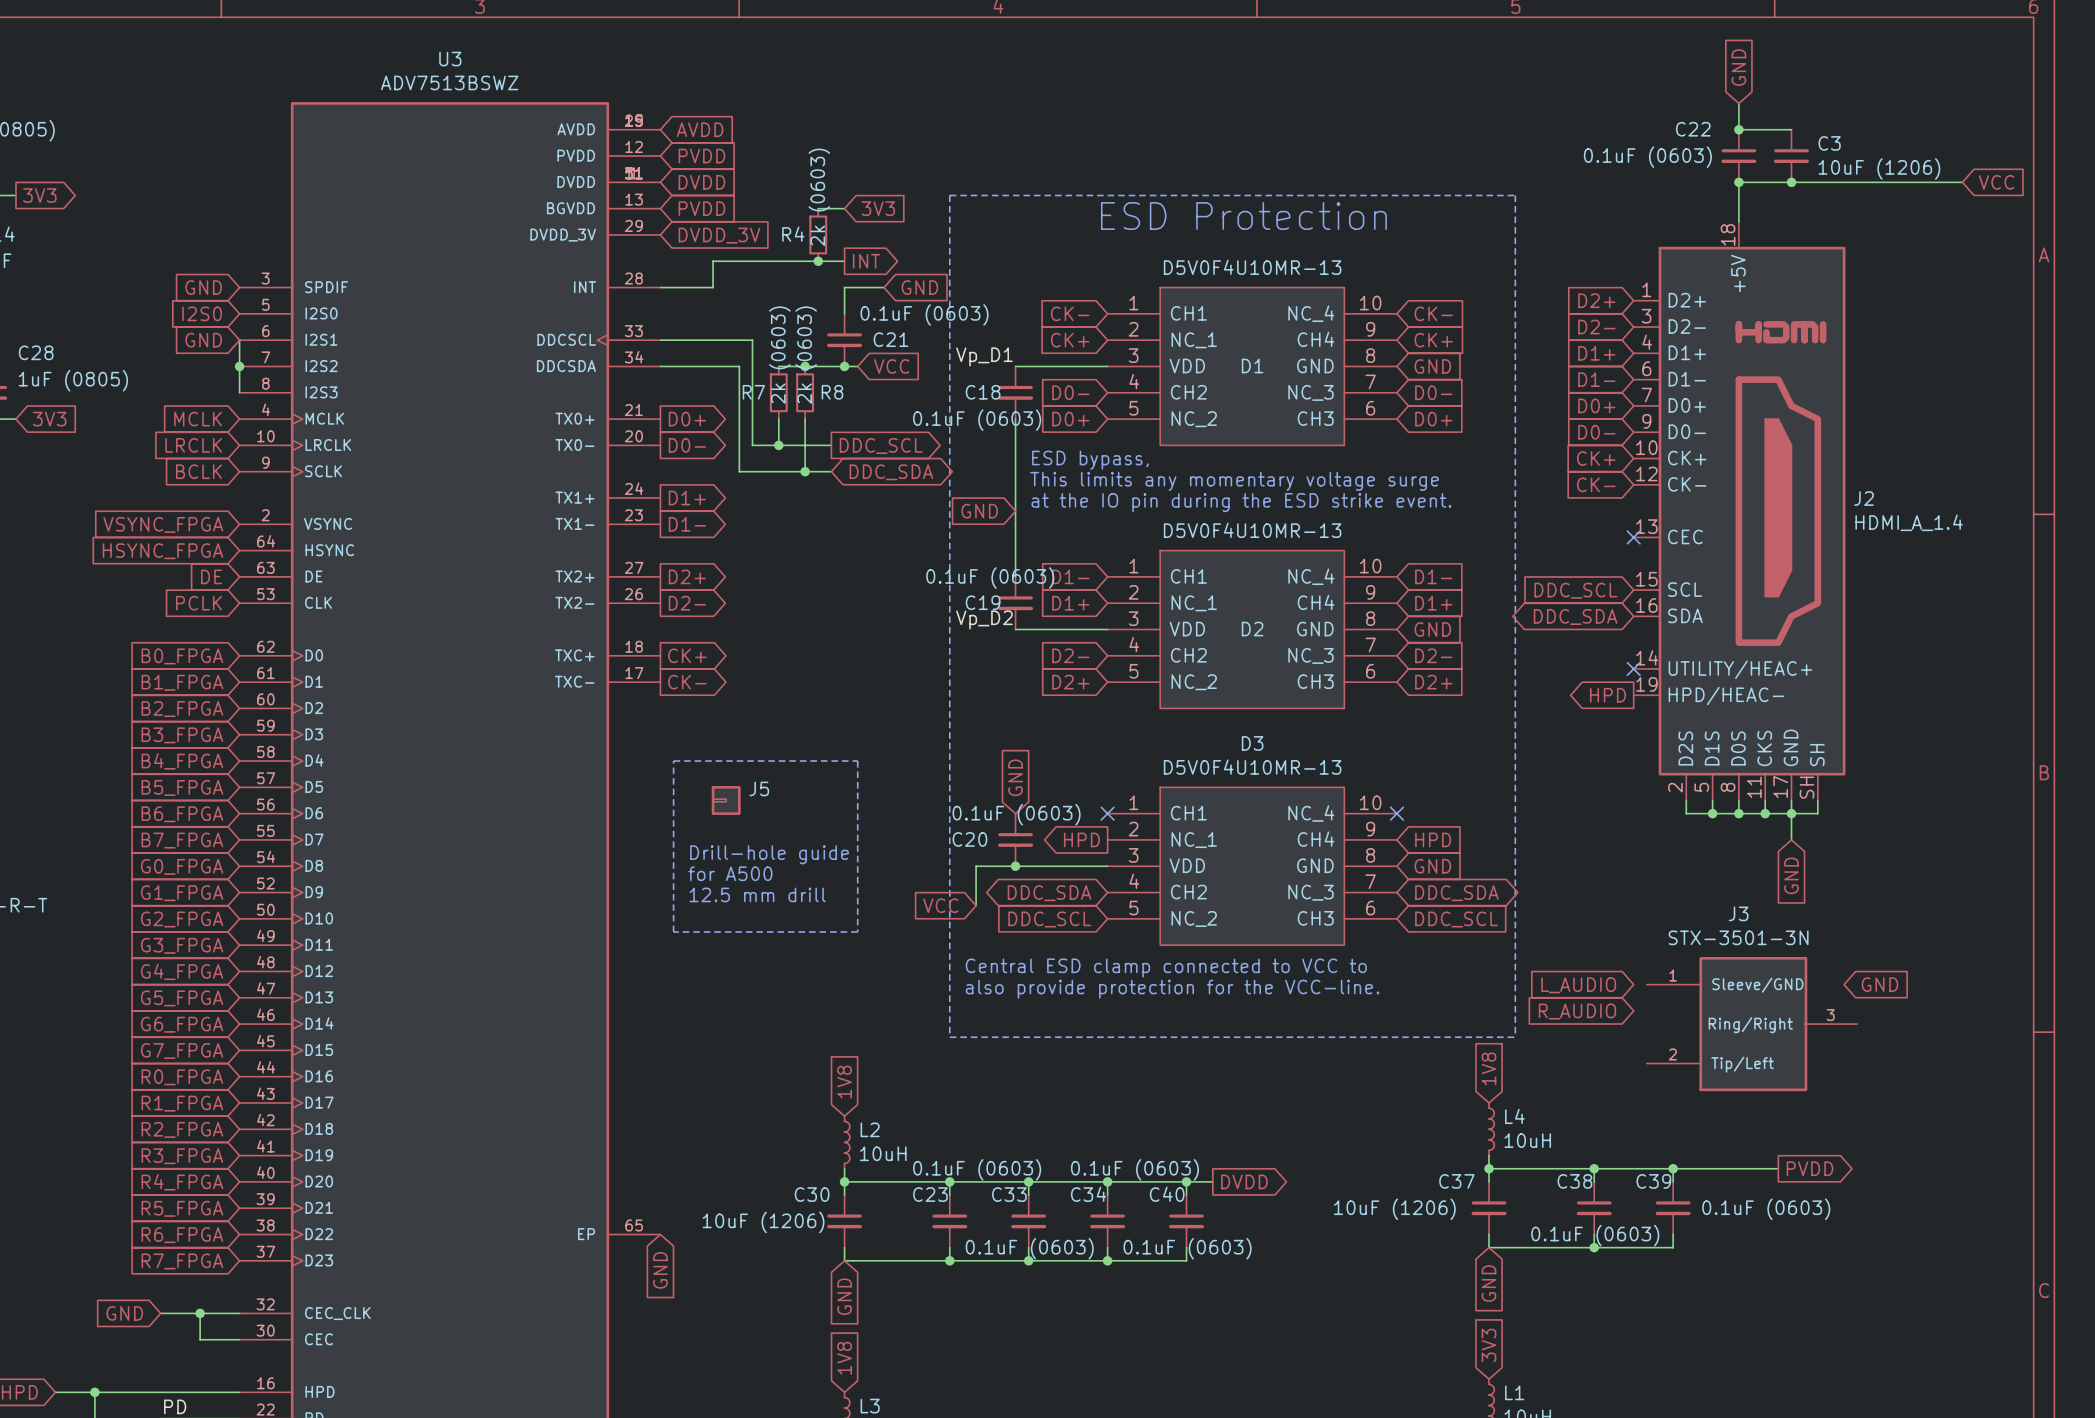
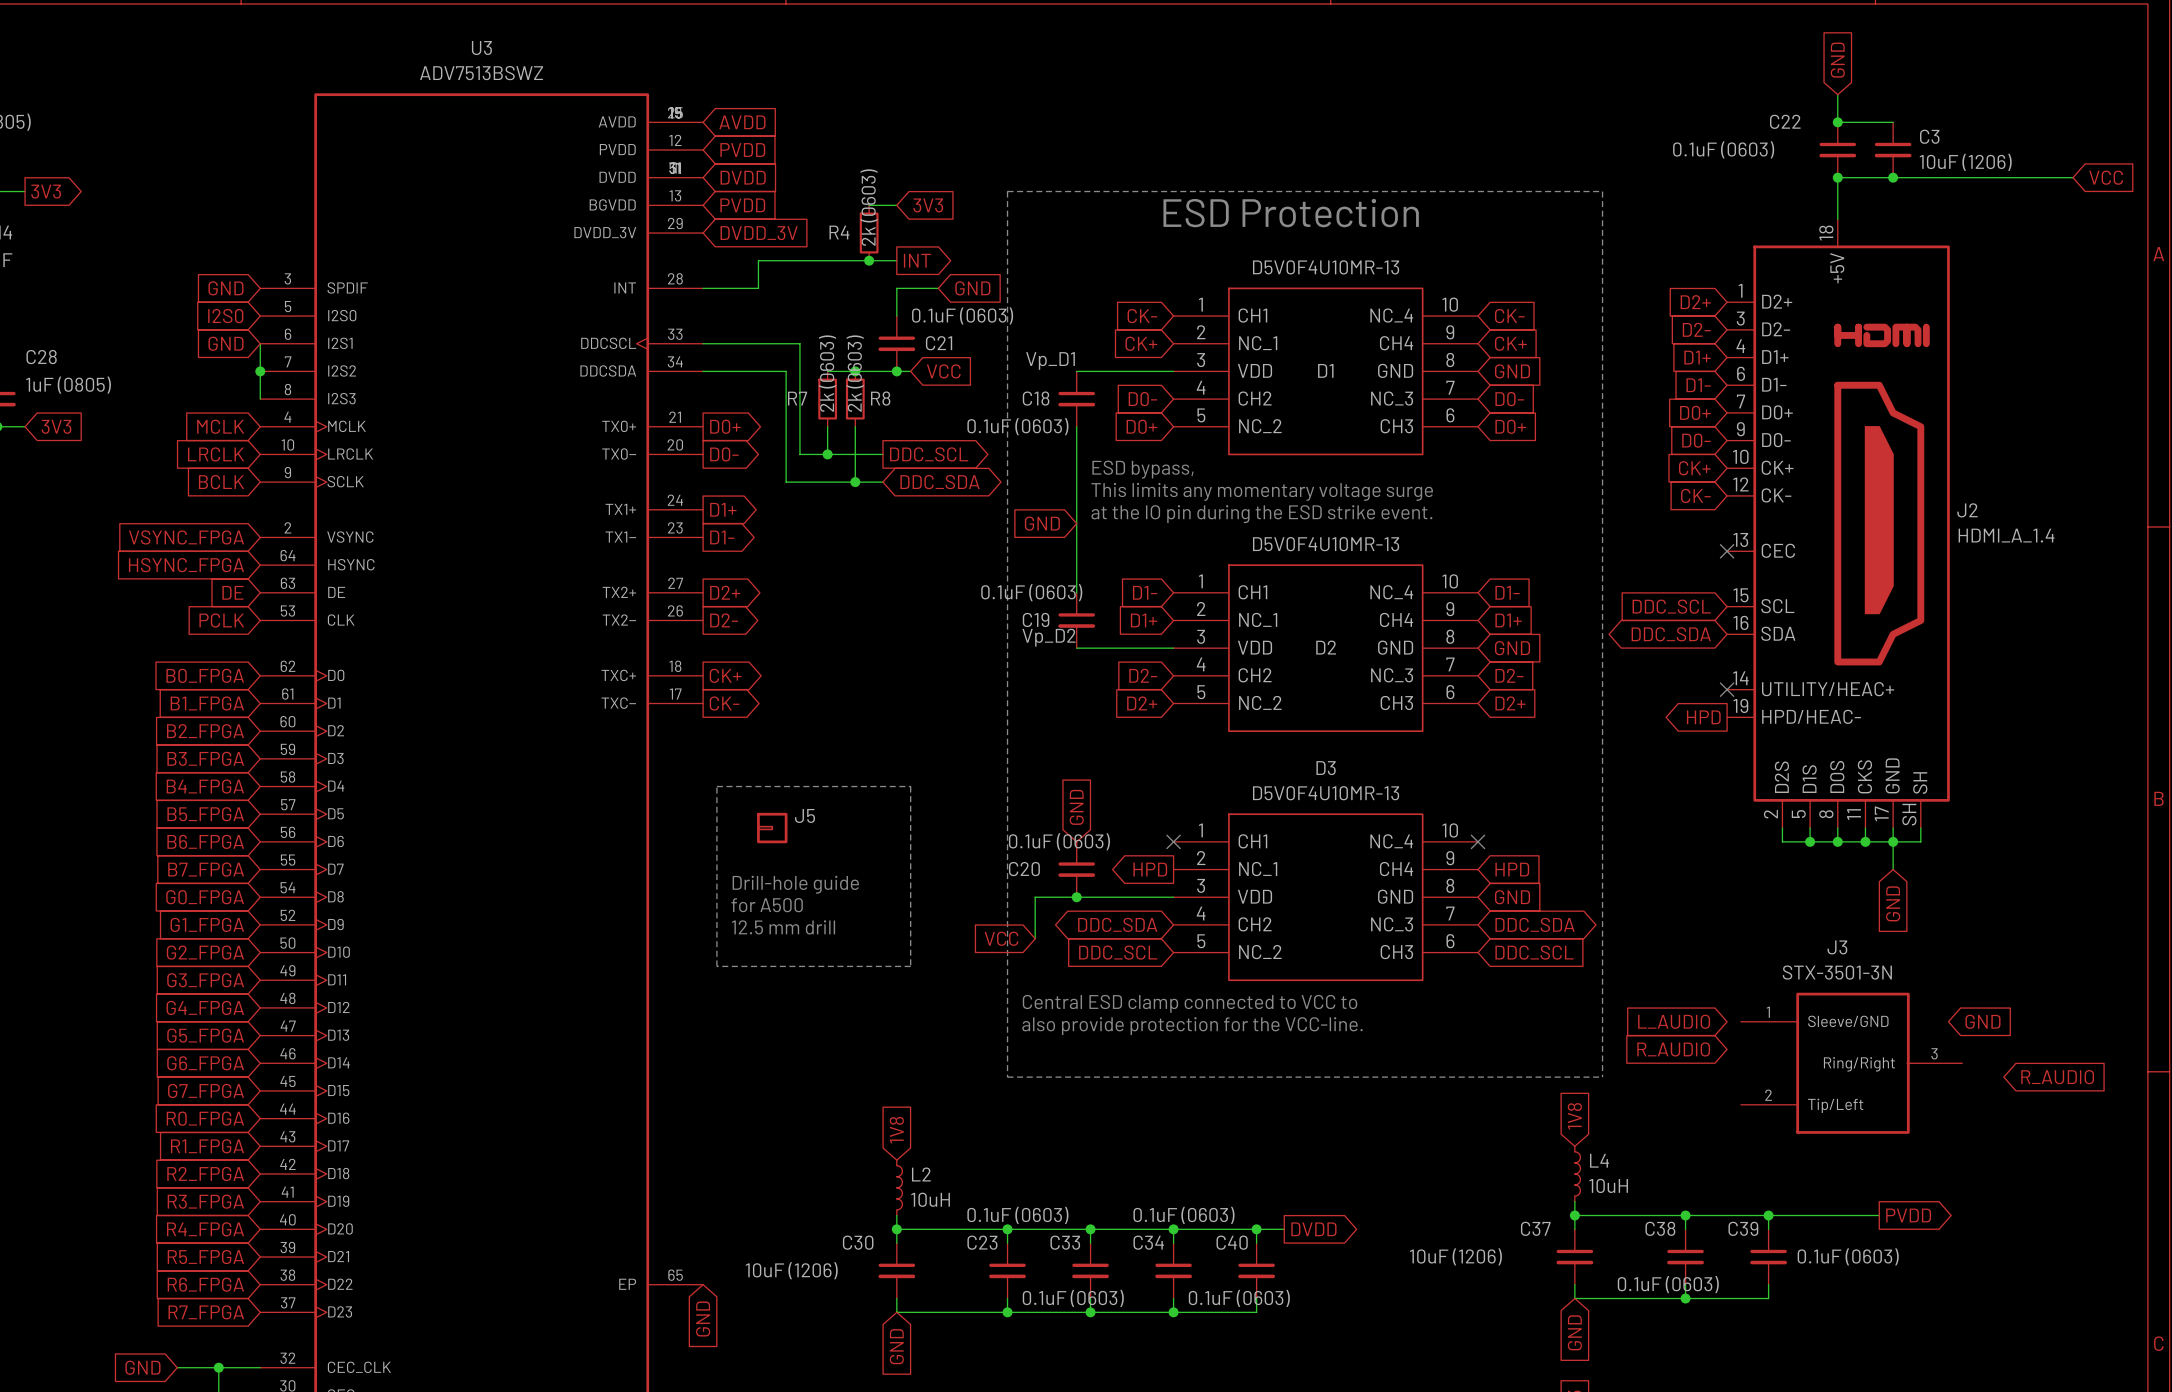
global label: none -> R_AUDIO (2057, 1077)

